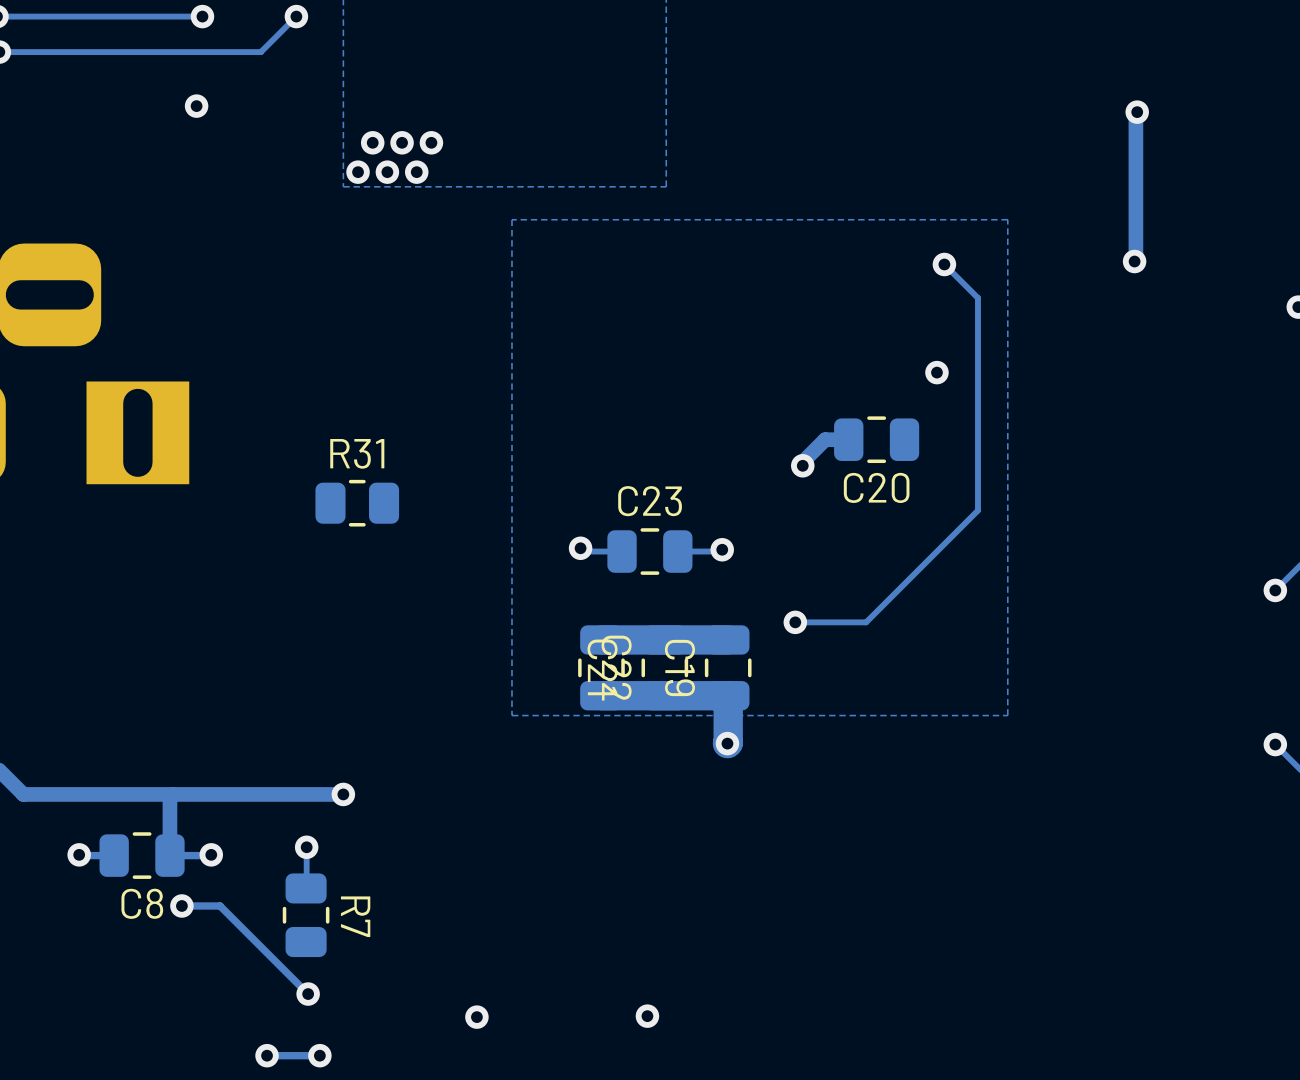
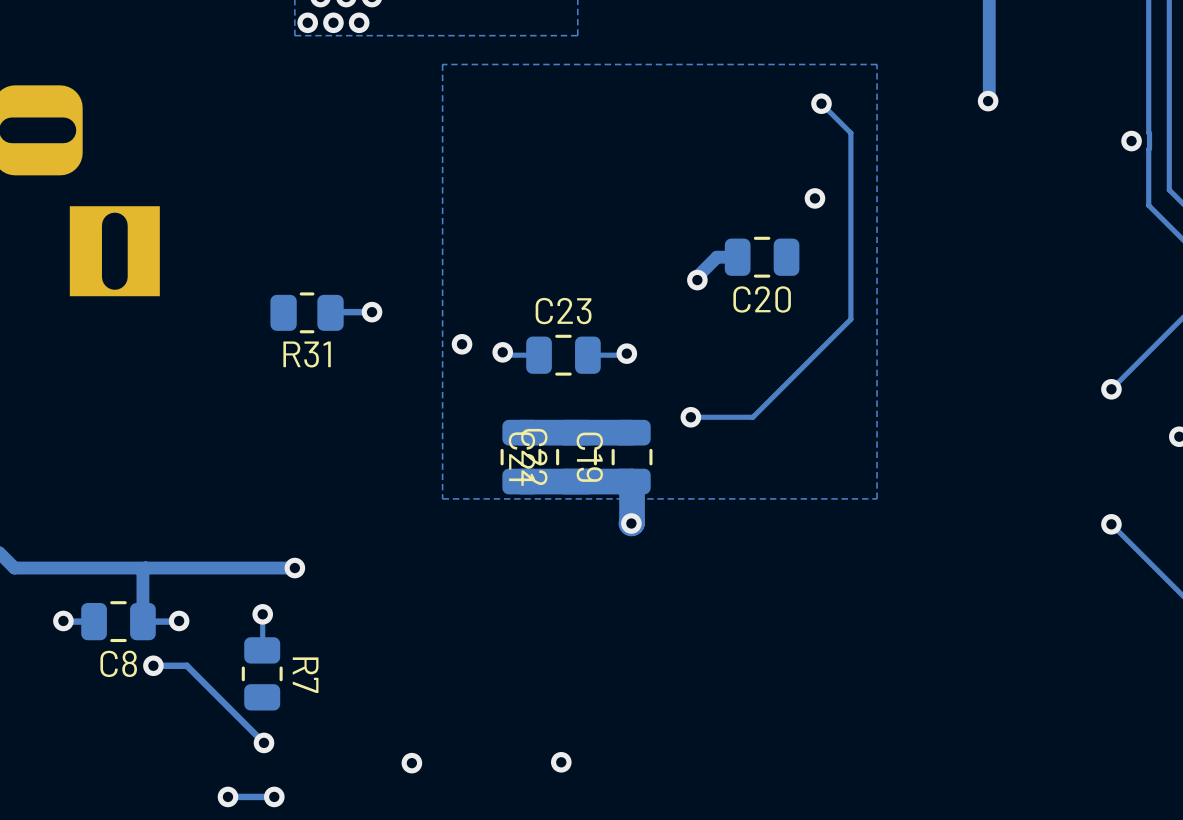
R31 name position: R31 (357, 453) -> R31 (307, 354)
track: none -> (372, 312) (330, 312)
via: none -> (372, 312)
via: none -> (462, 344)

